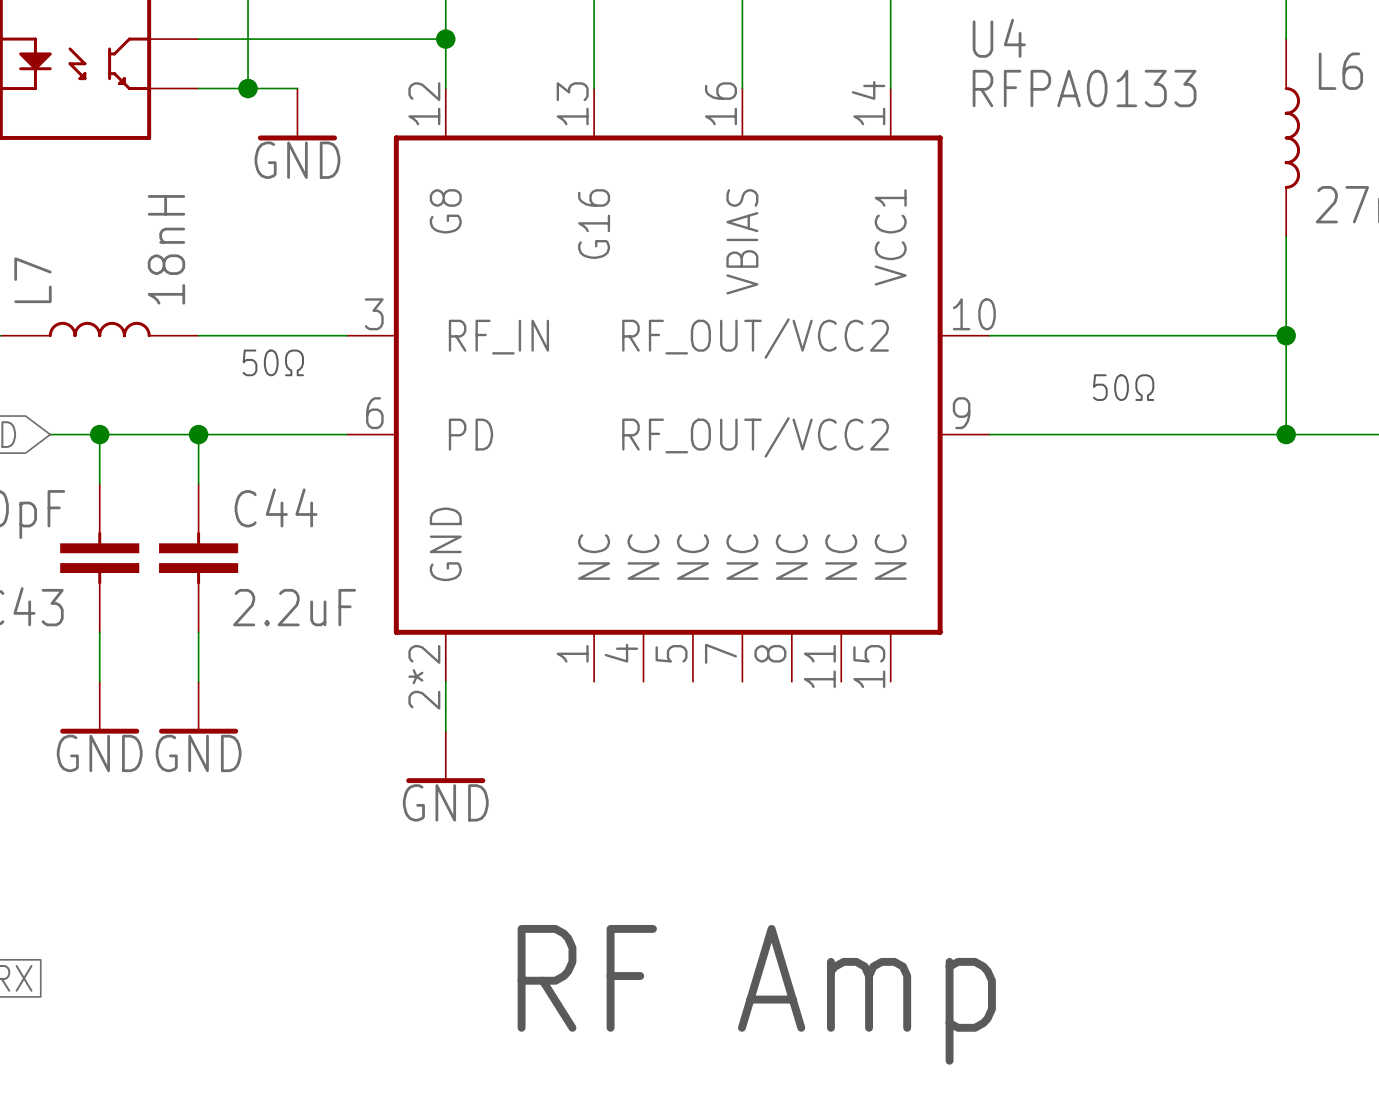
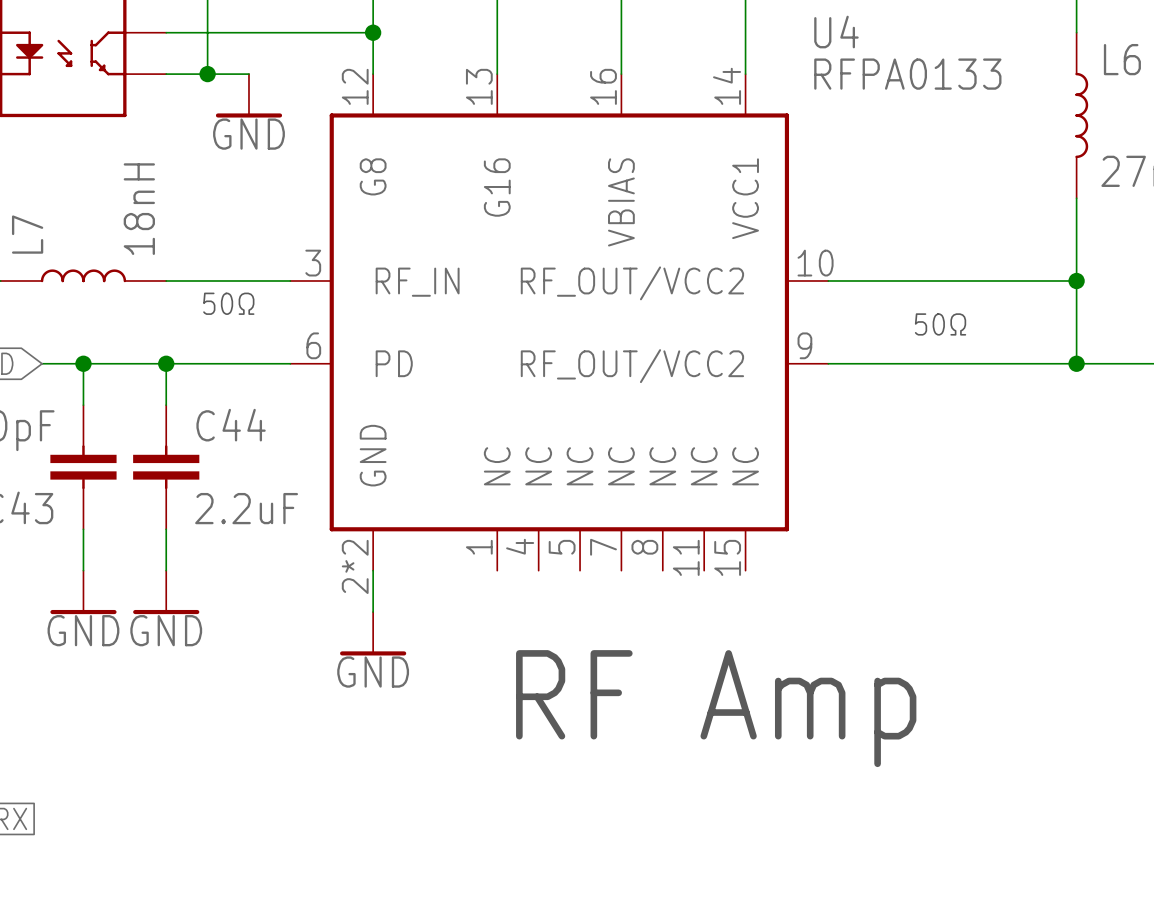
text position: RF Amp (756, 994) -> RF Amp (716, 708)

